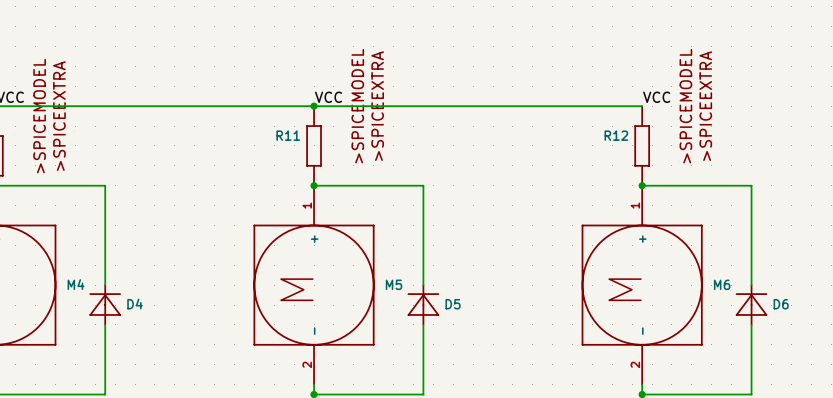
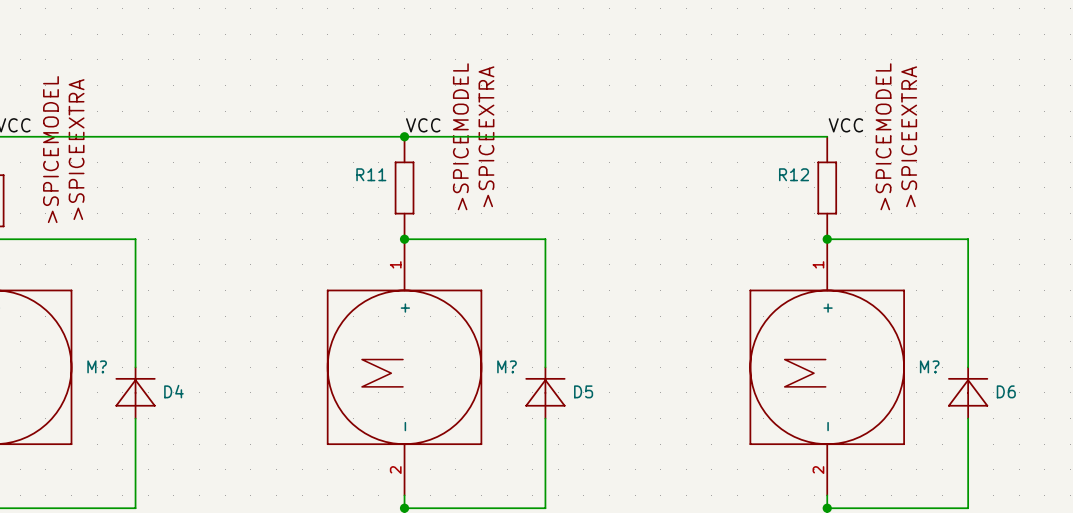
M4 name: M4 (76, 284) -> M? (97, 366)
M5 name: M5 (394, 284) -> M? (507, 366)
M6 name: M6 (722, 284) -> M? (929, 366)

